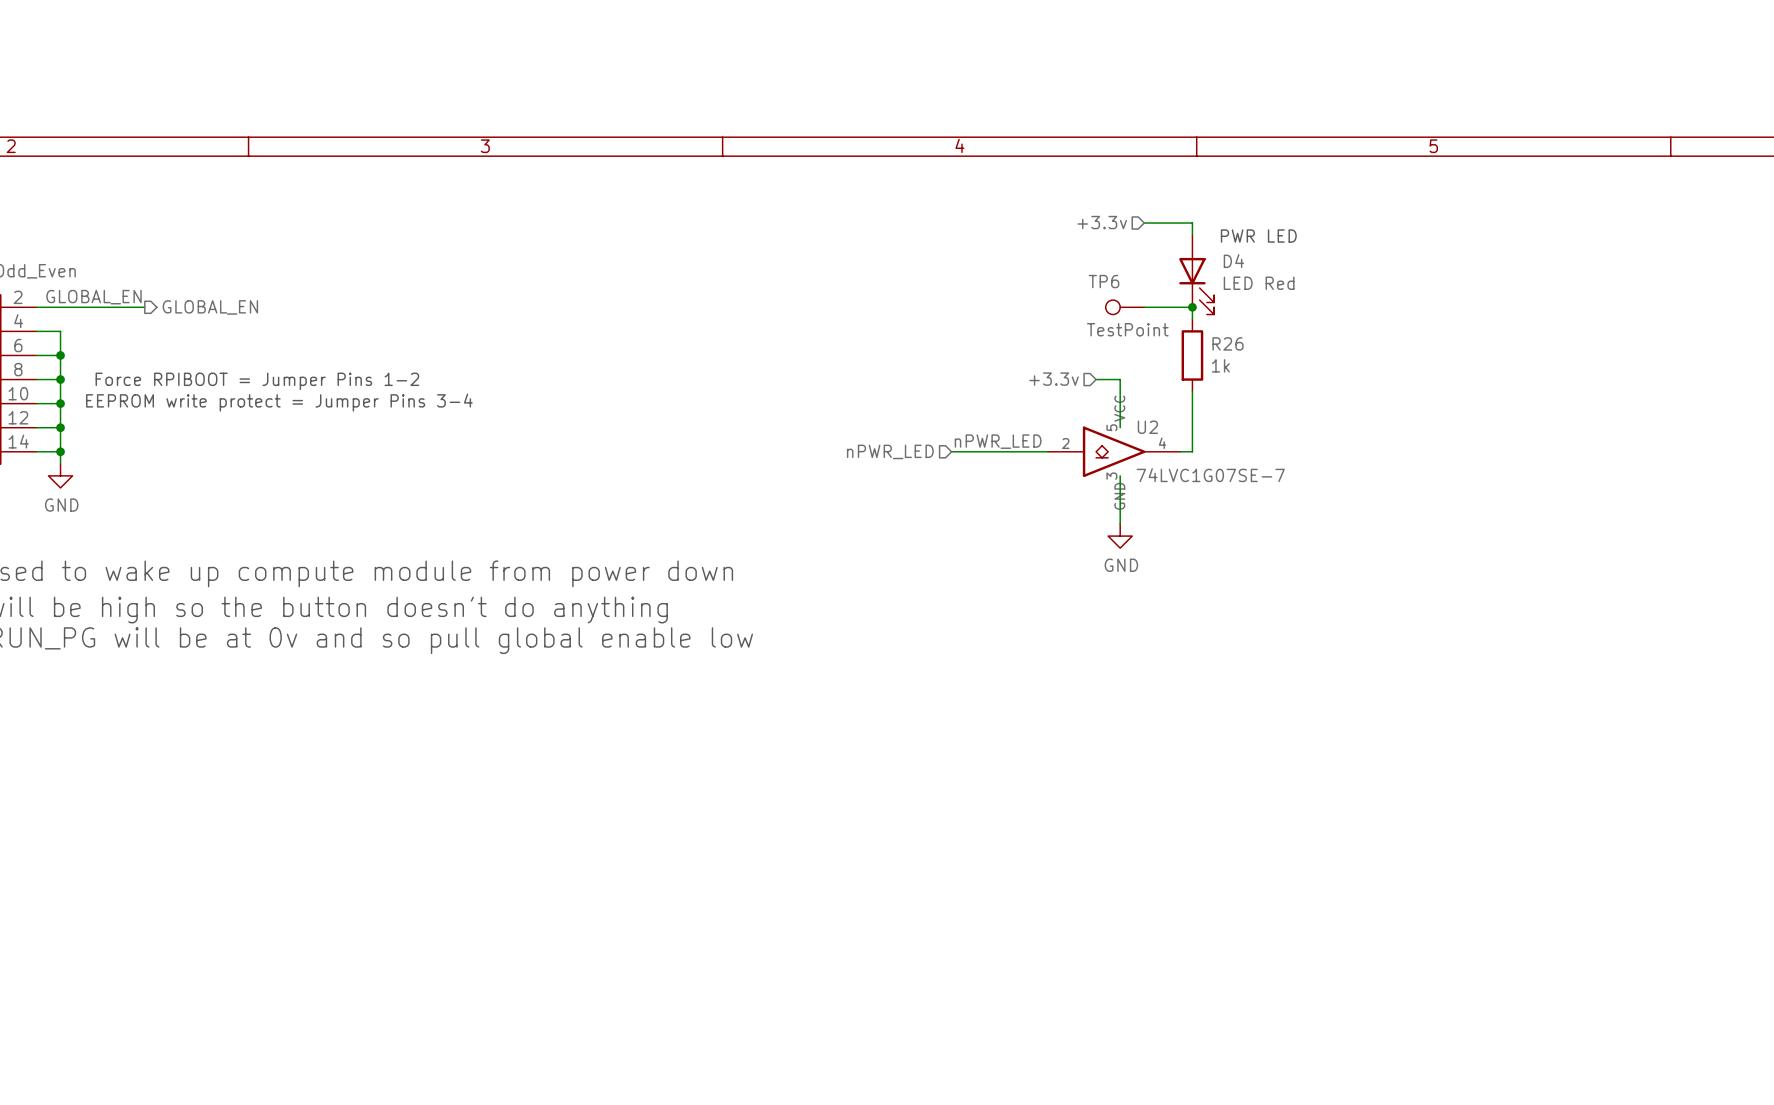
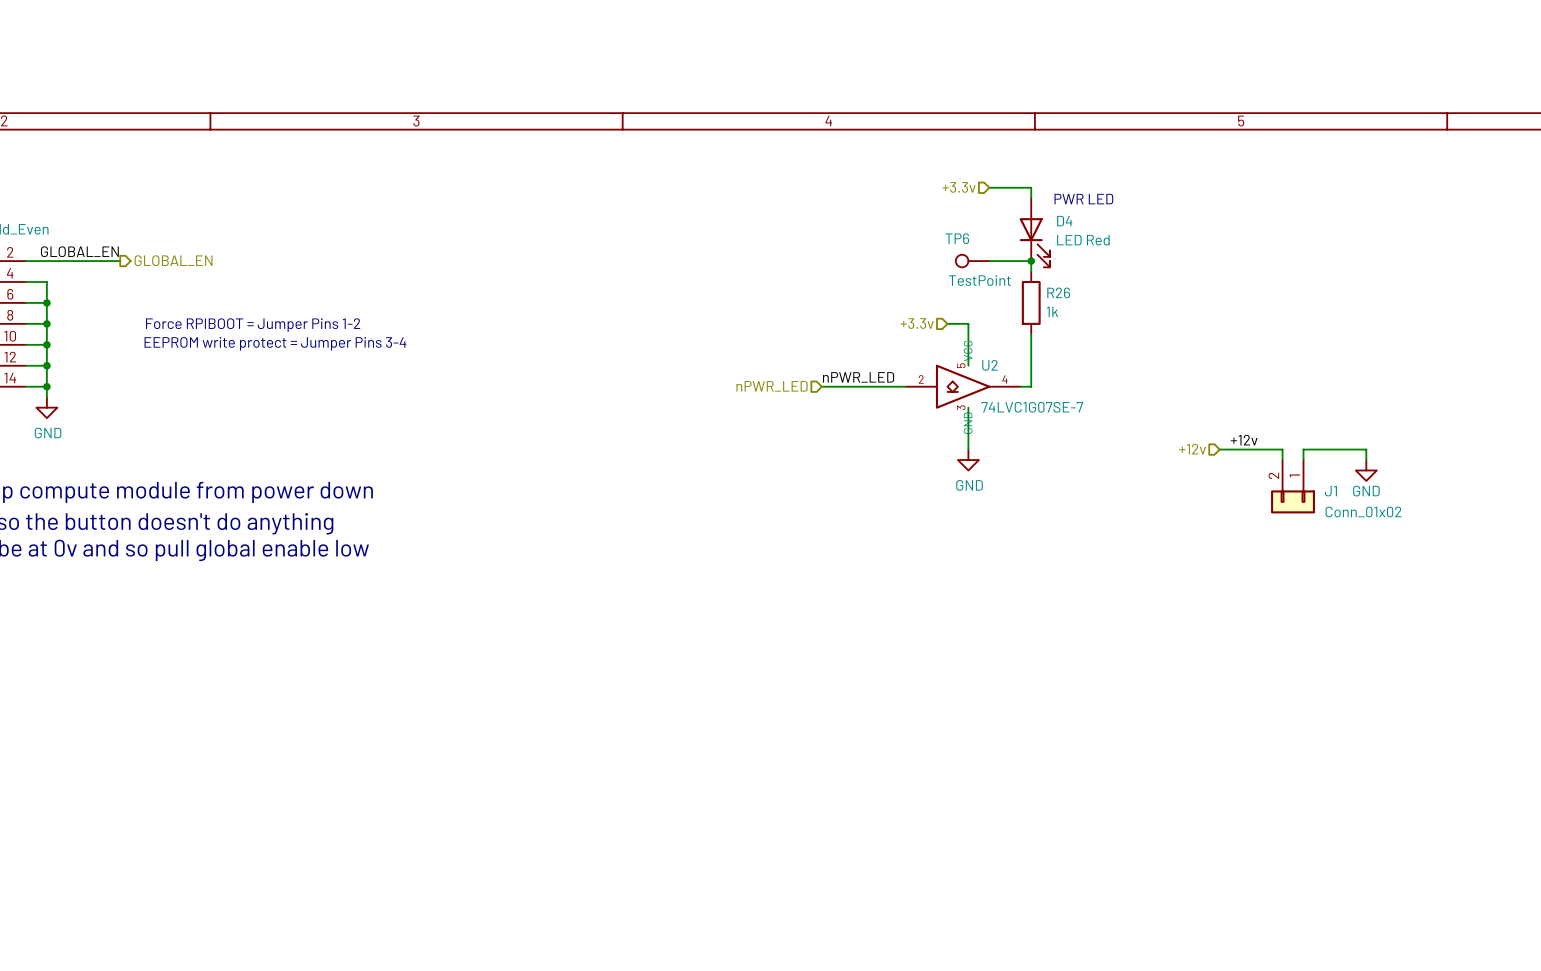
label: none -> +12v (1244, 440)
hierarchical label: none -> +12v (1192, 449)
wire: none -> (1219, 449) (1282, 449) (1282, 460)
wire: none -> (1303, 460) (1303, 449) (1366, 449) (1366, 460)
power symbol: none -> GND (1366, 470)
J1: none -> Conn_01x02 (1293, 486)

